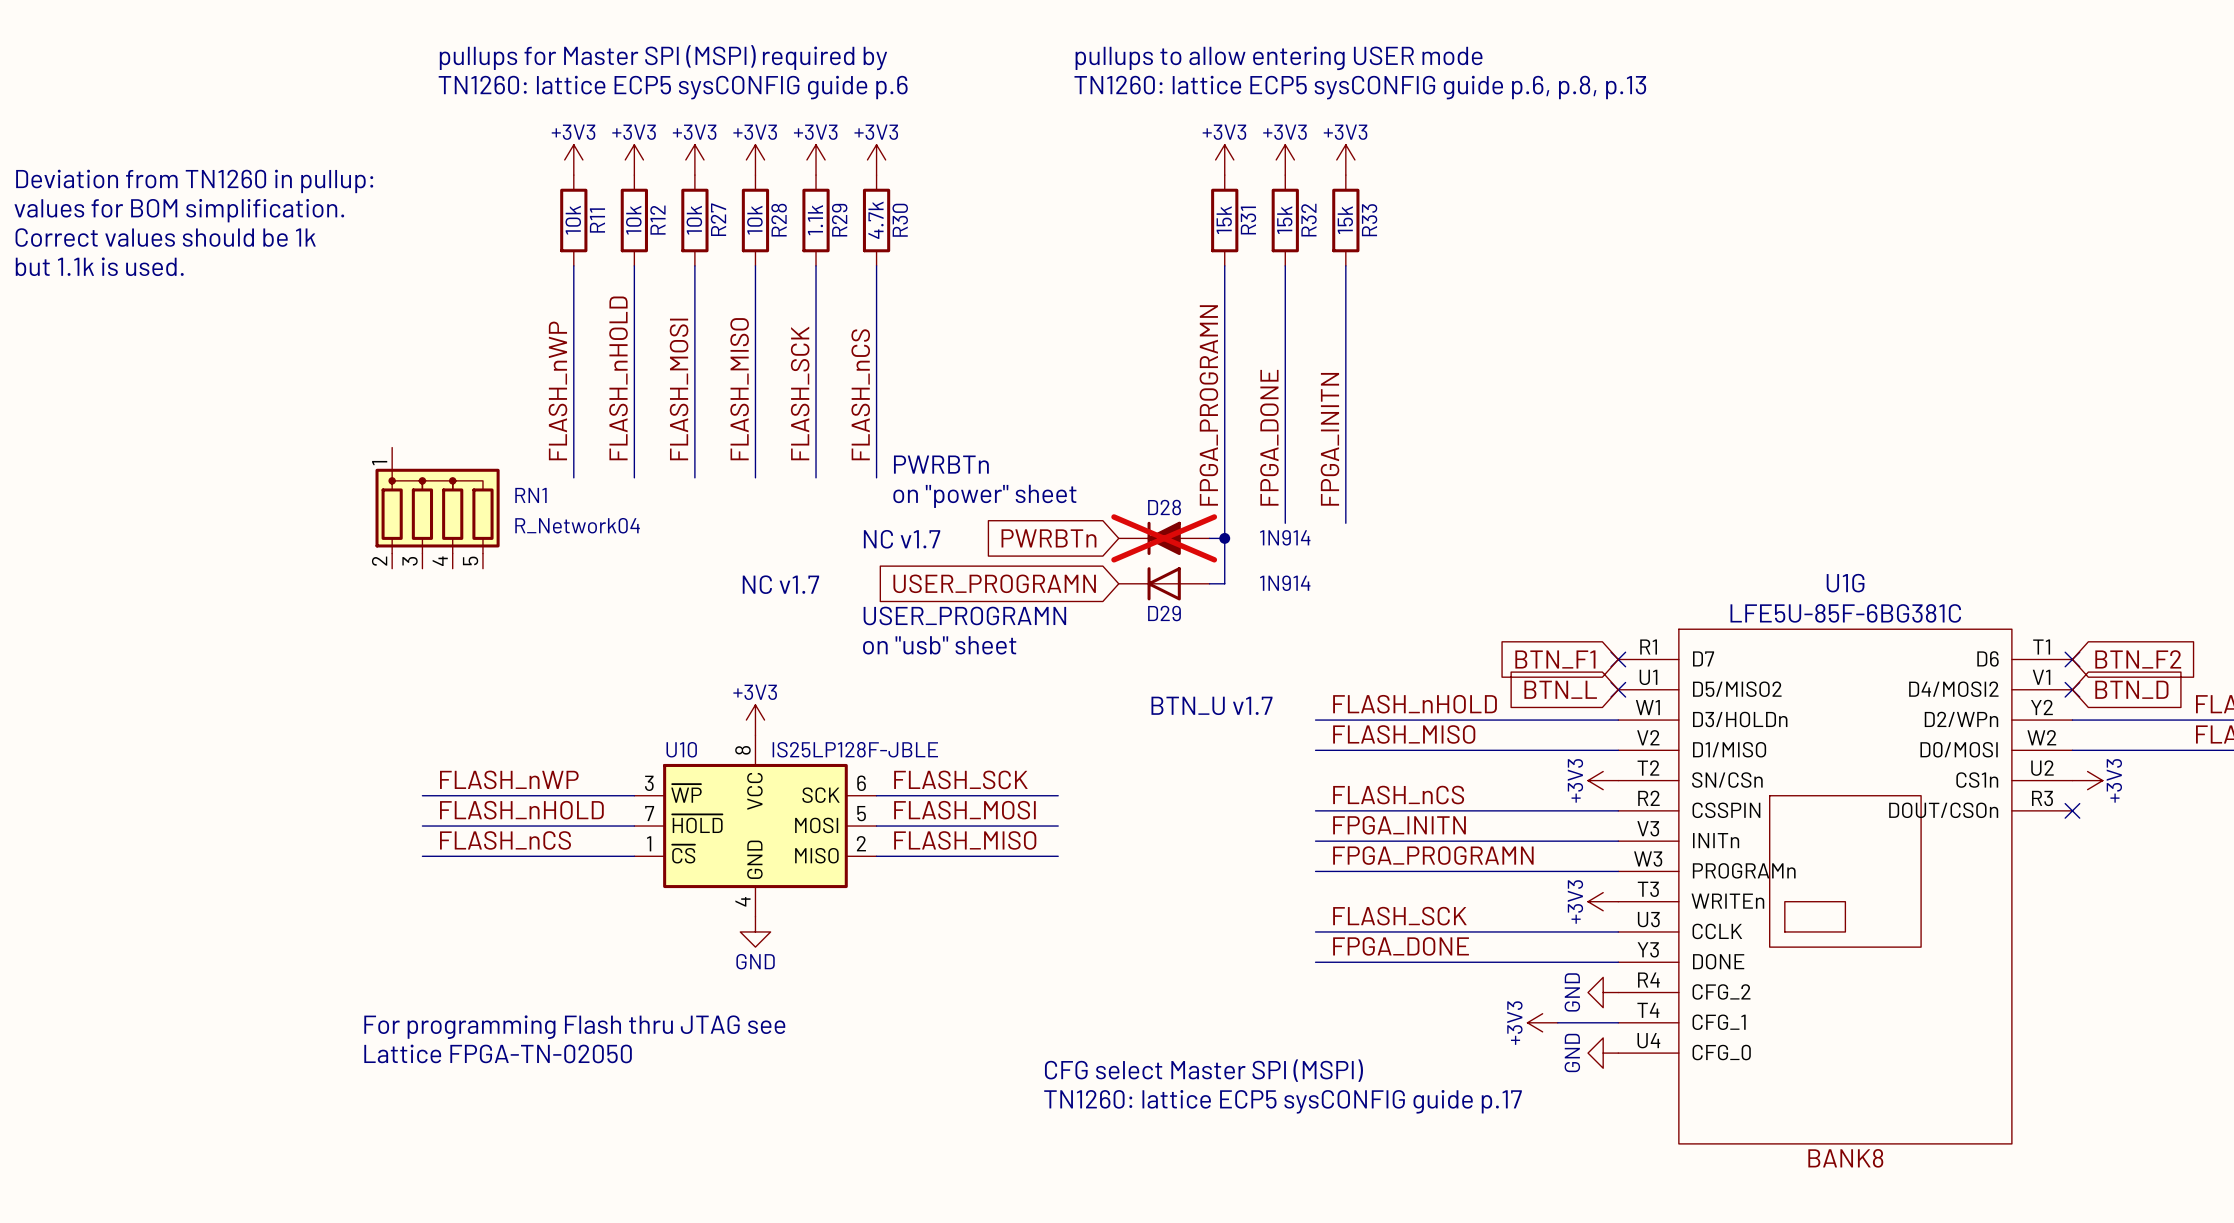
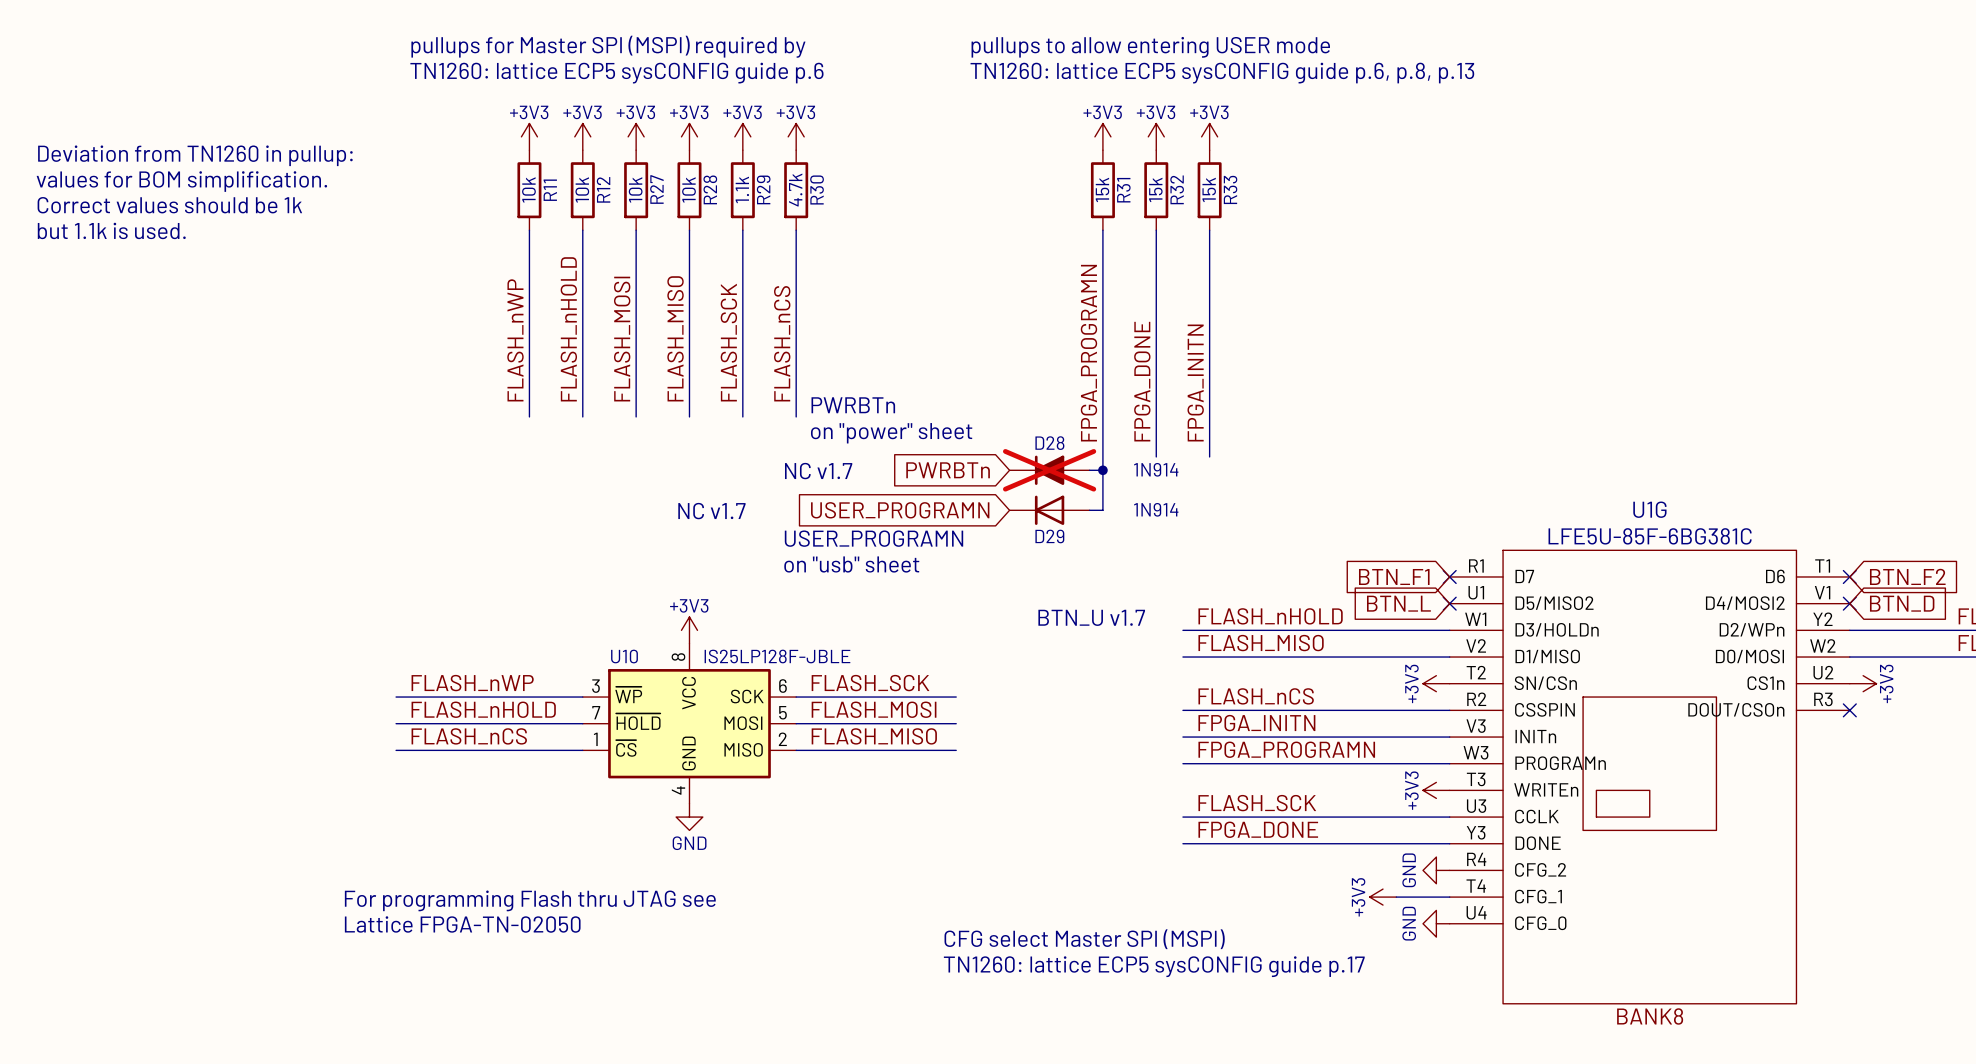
RN1: R_Network04 (437, 508) -> none

